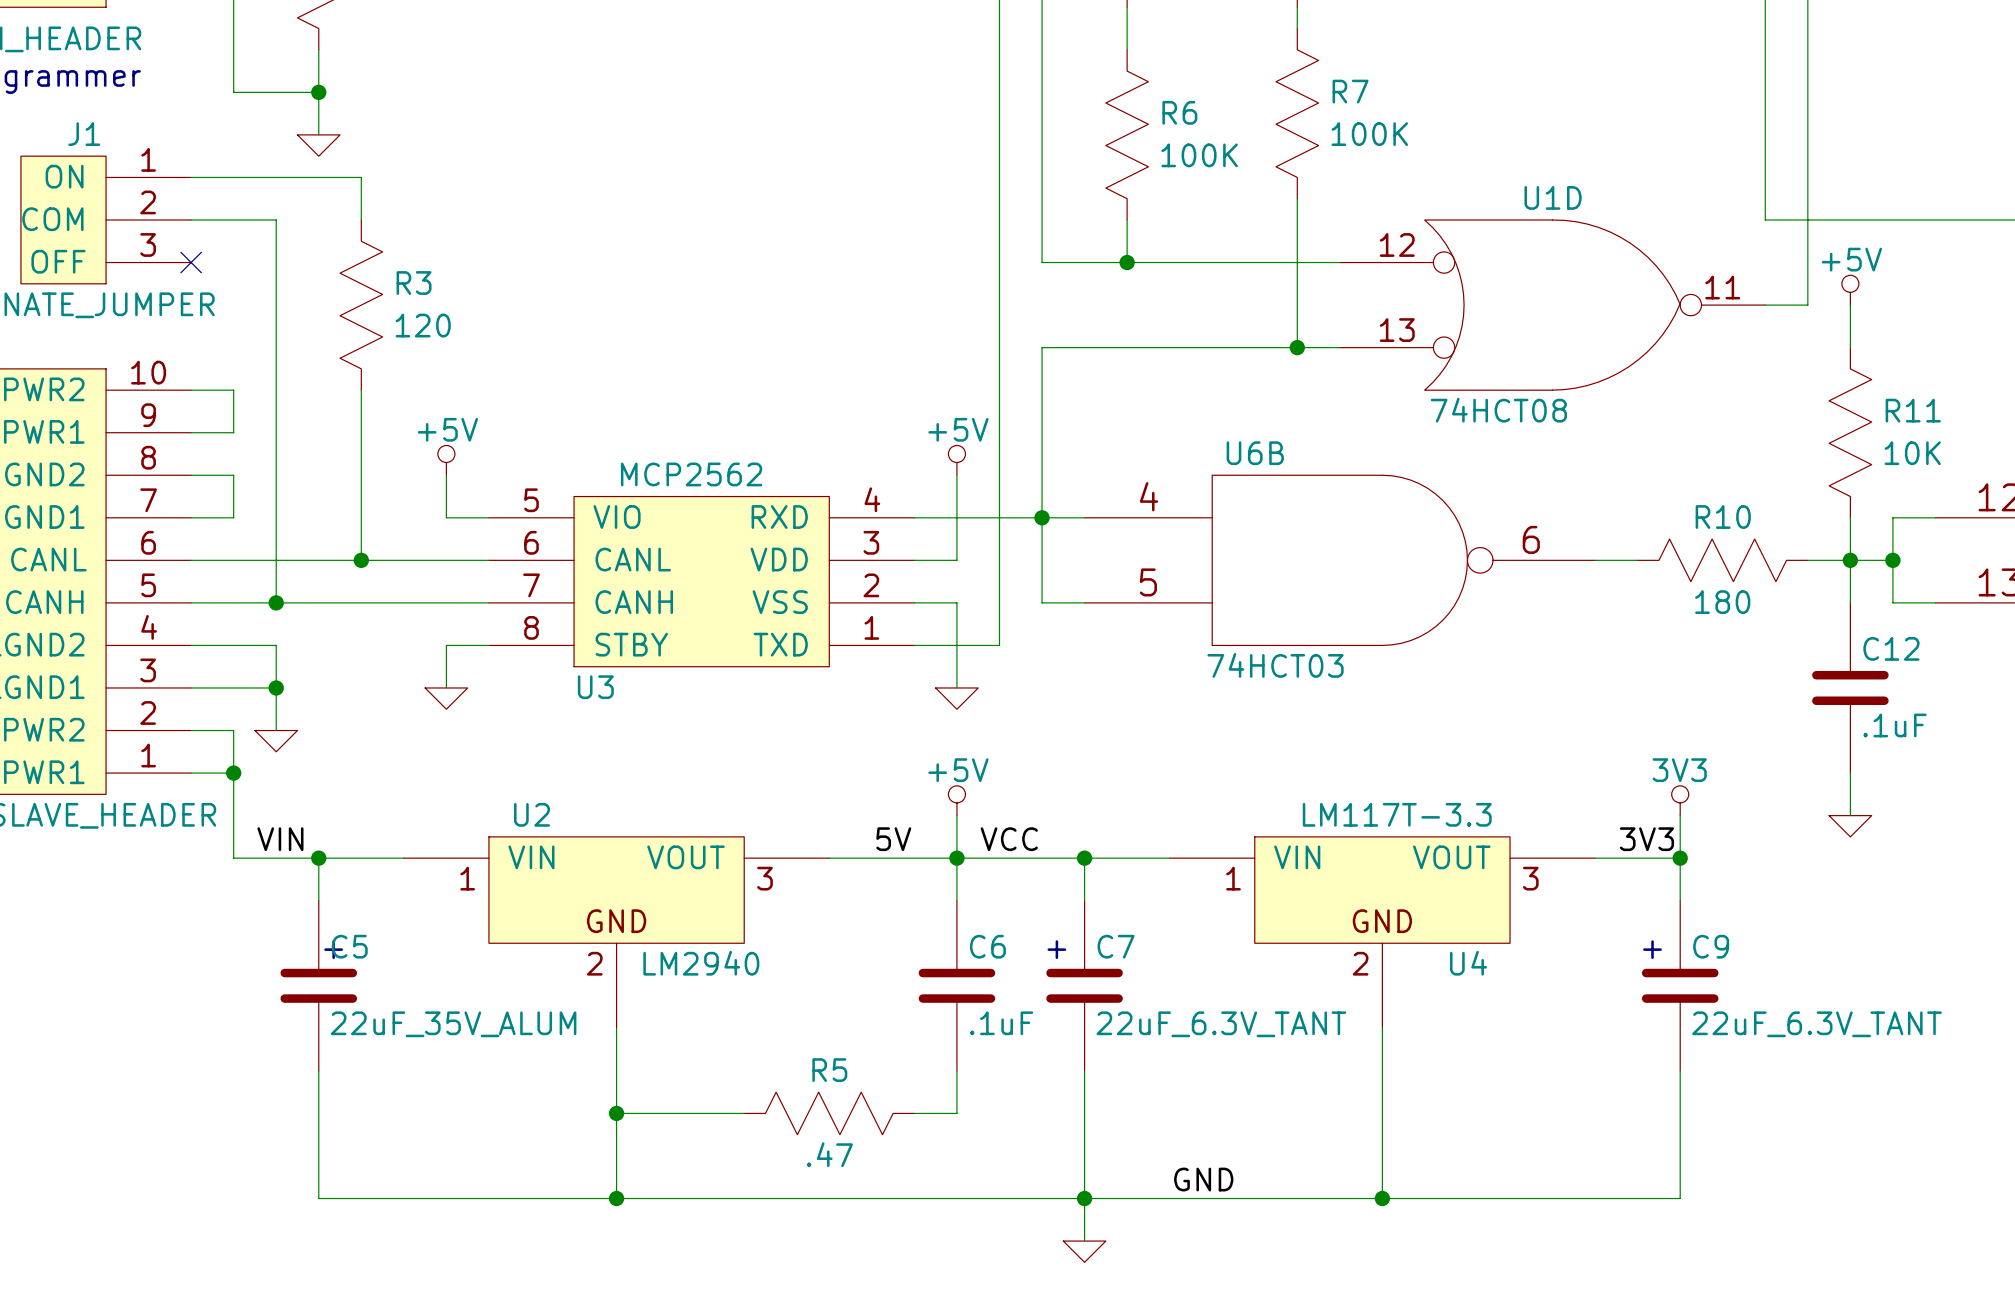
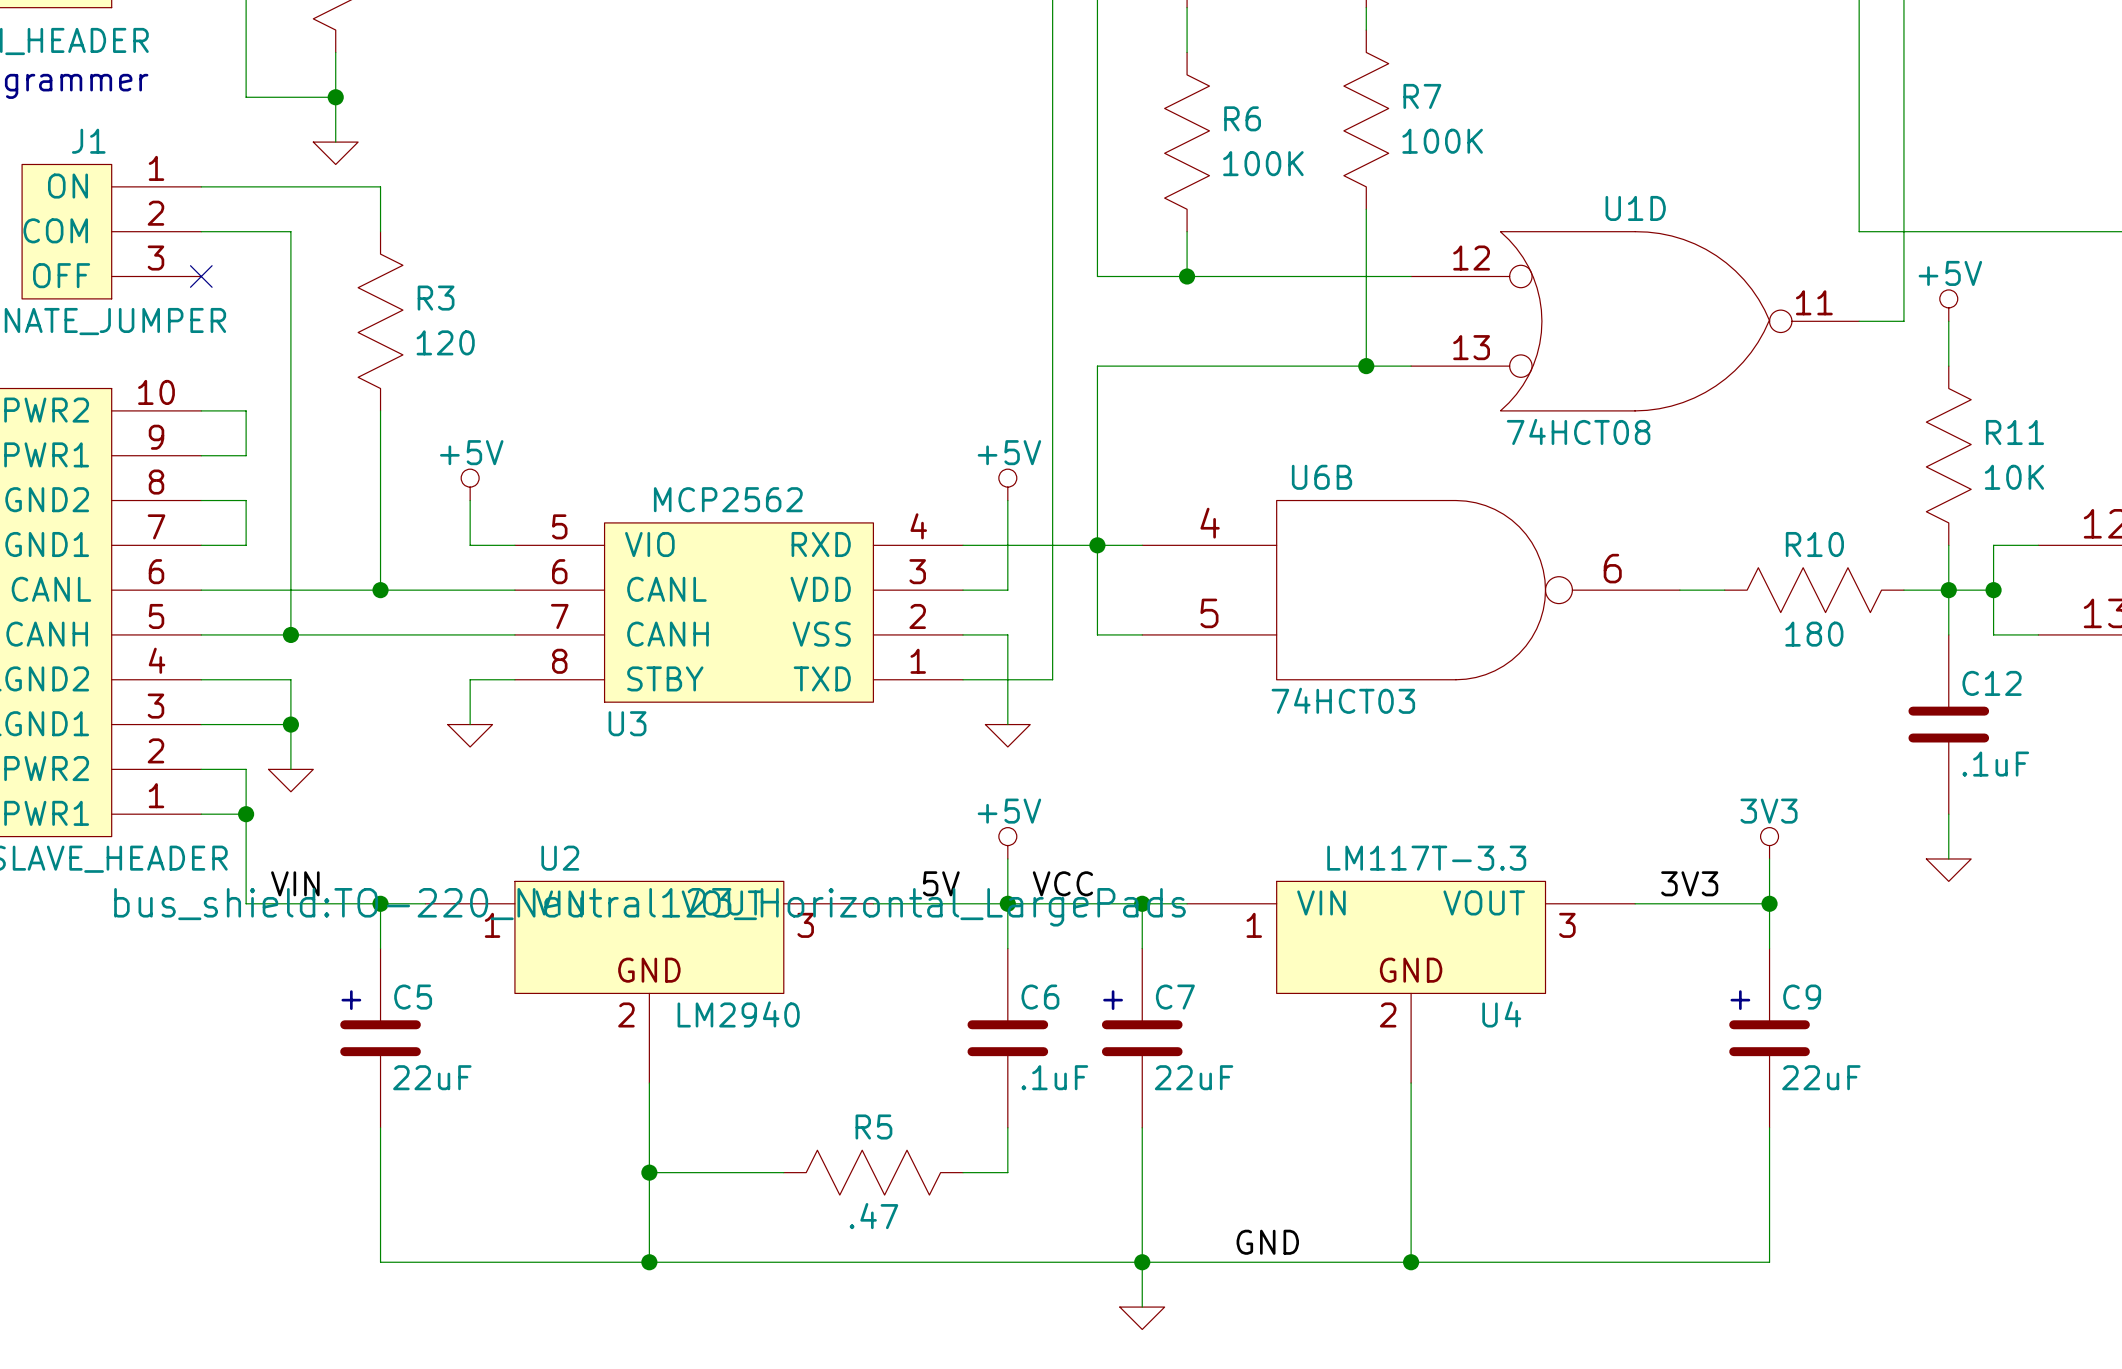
label position: 3V3 (1646, 839) -> 3V3 (1689, 883)
wire: (318, 858) (318, 900) -> (380, 903) (380, 948)
junction position: (318, 858) -> (380, 903)
U2 text: none -> bus_shield:TO-220_Neutral123_Horizontal_LargePads (650, 907)
U4 position: (1382, 932) -> (1411, 982)
C5 position: (318, 985) -> (380, 1038)
C5 value: 22uF_35V_ALUM (453, 1024) -> 22uF (432, 1077)
C7 value: 22uF_6.3V_TANT (1221, 1024) -> 22uF (1194, 1077)
C9 value: 22uF_6.3V_TANT (1817, 1024) -> 22uF (1821, 1077)
wire: (1382, 1028) (1382, 1198) -> (1411, 1083) (1411, 1262)
wire: (318, 1070) (318, 1198) (361, 1198) -> (380, 1127) (380, 1262)
junction position: (1382, 1198) -> (1411, 1262)

